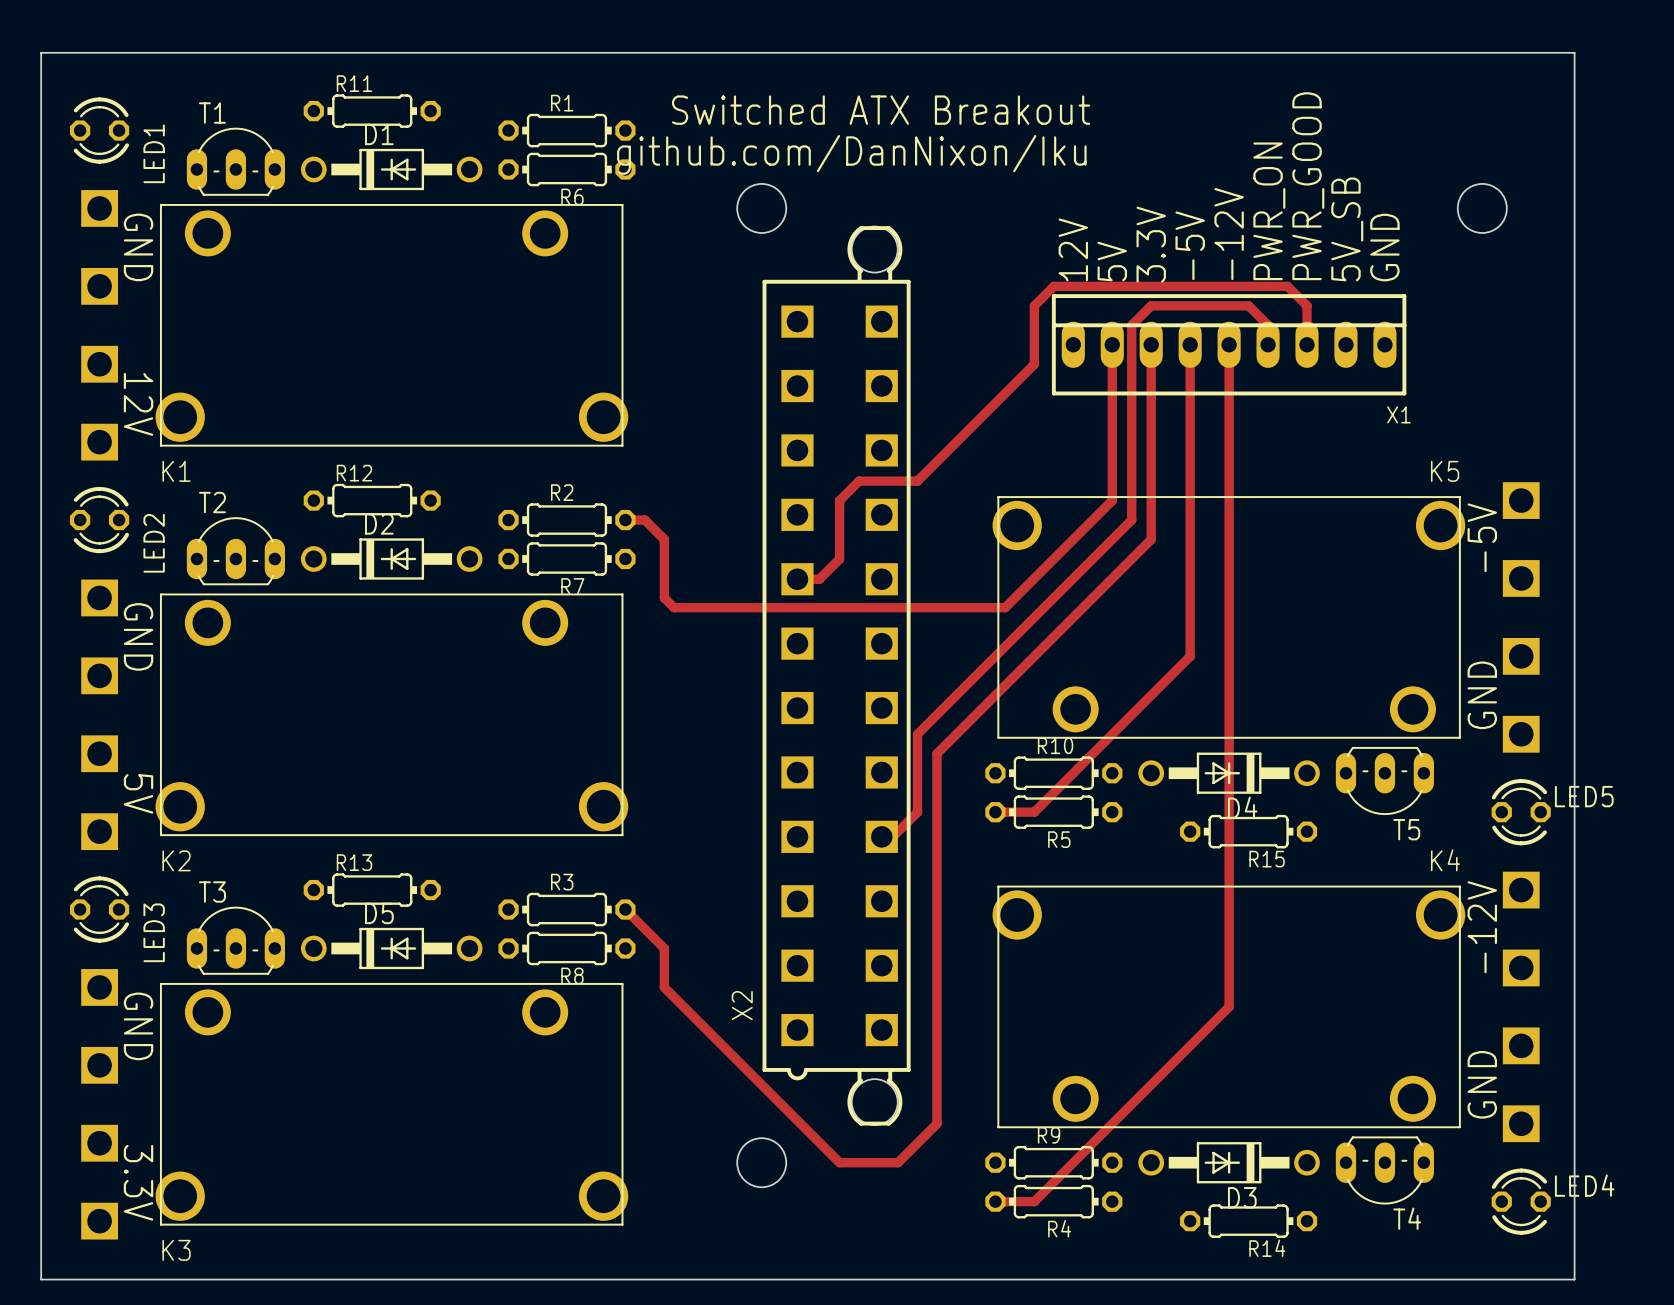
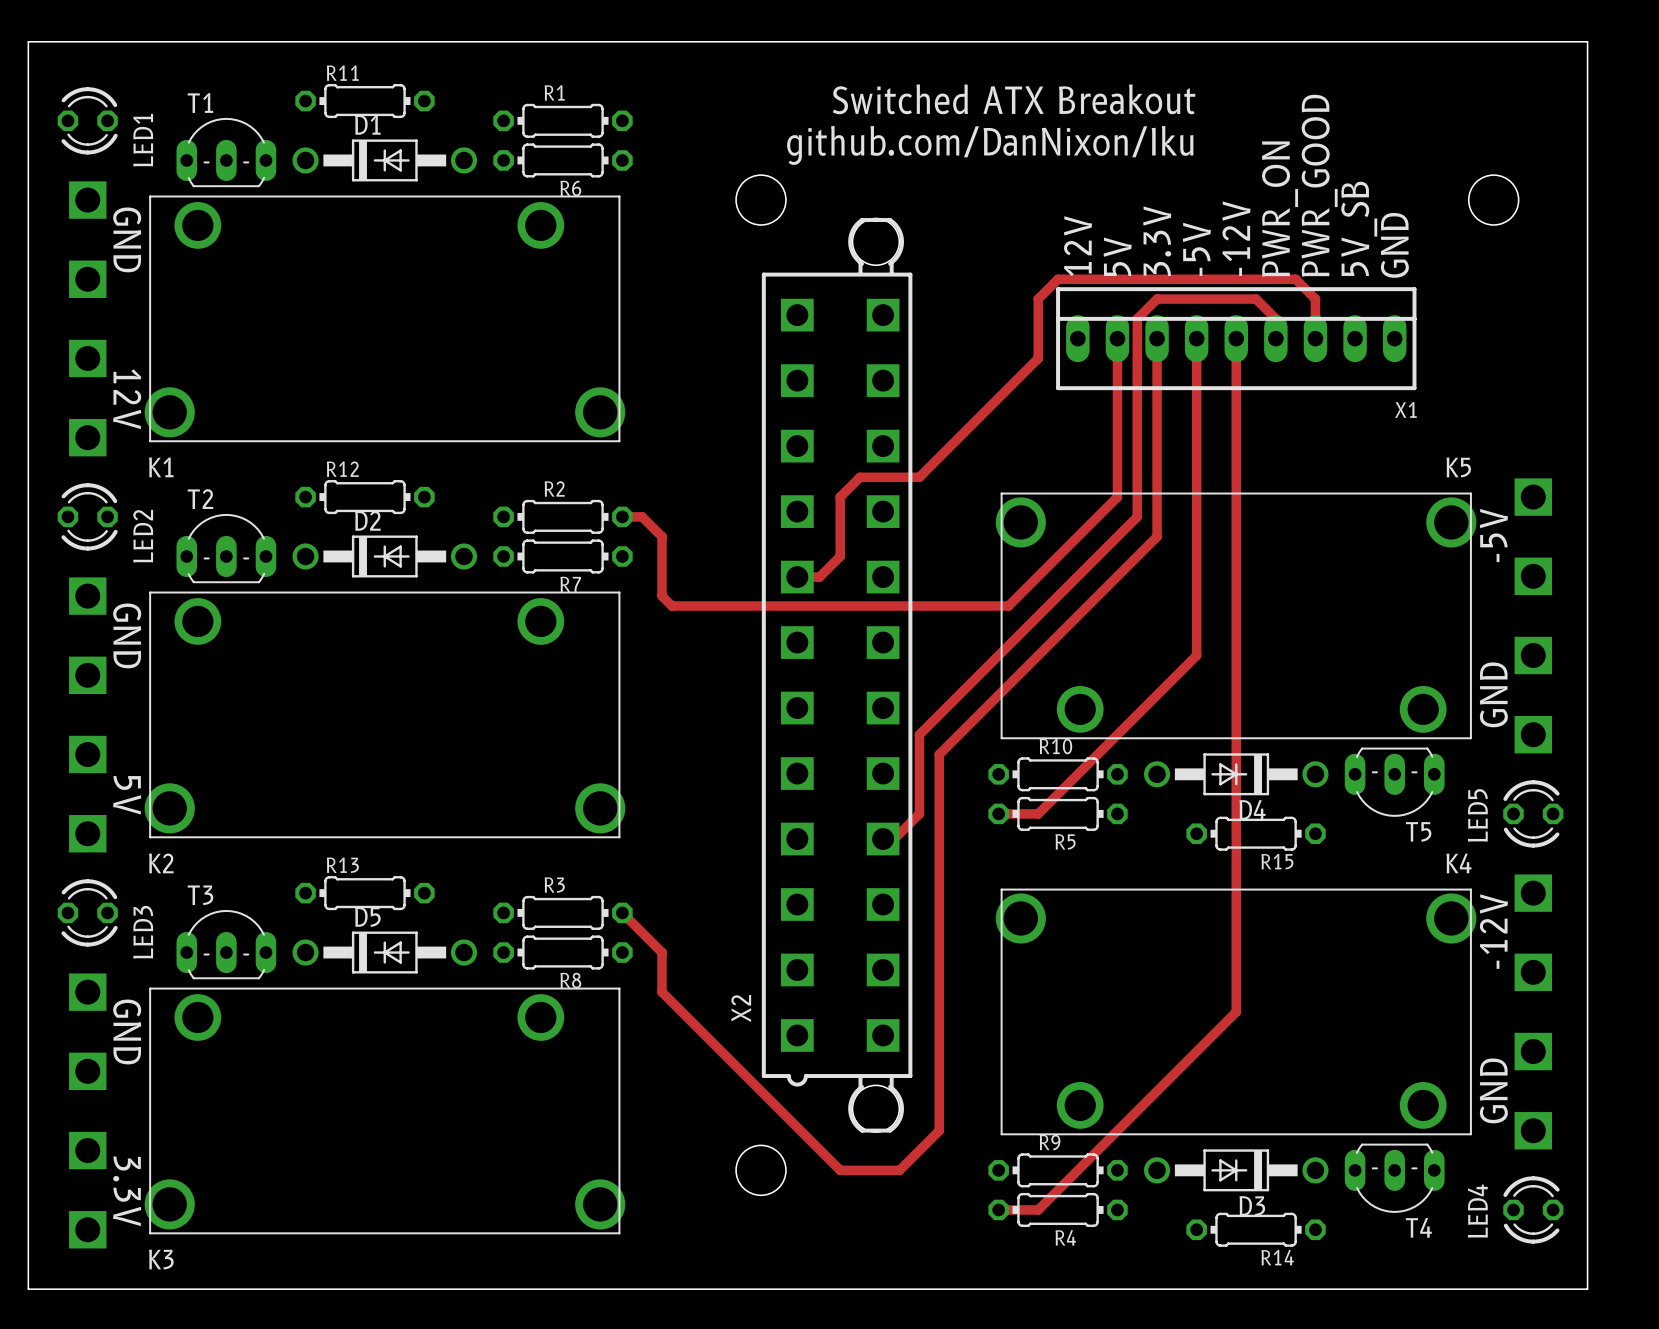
text position: Switched ATX Breakout (881, 110) -> Switched ATX Breakout (1014, 99)
text position: github.com/DanNixon/Iku (851, 154) -> github.com/DanNixon/Iku (990, 145)
LED5 name rotation: 0° (1584, 796) -> 90° counterclockwise (1477, 815)
LED5 name position: LED5 (1584, 796) -> LED5 (1477, 815)
LED4 name rotation: 0° (1584, 1185) -> 90° counterclockwise (1477, 1211)
LED4 name position: LED4 (1584, 1185) -> LED4 (1477, 1211)

